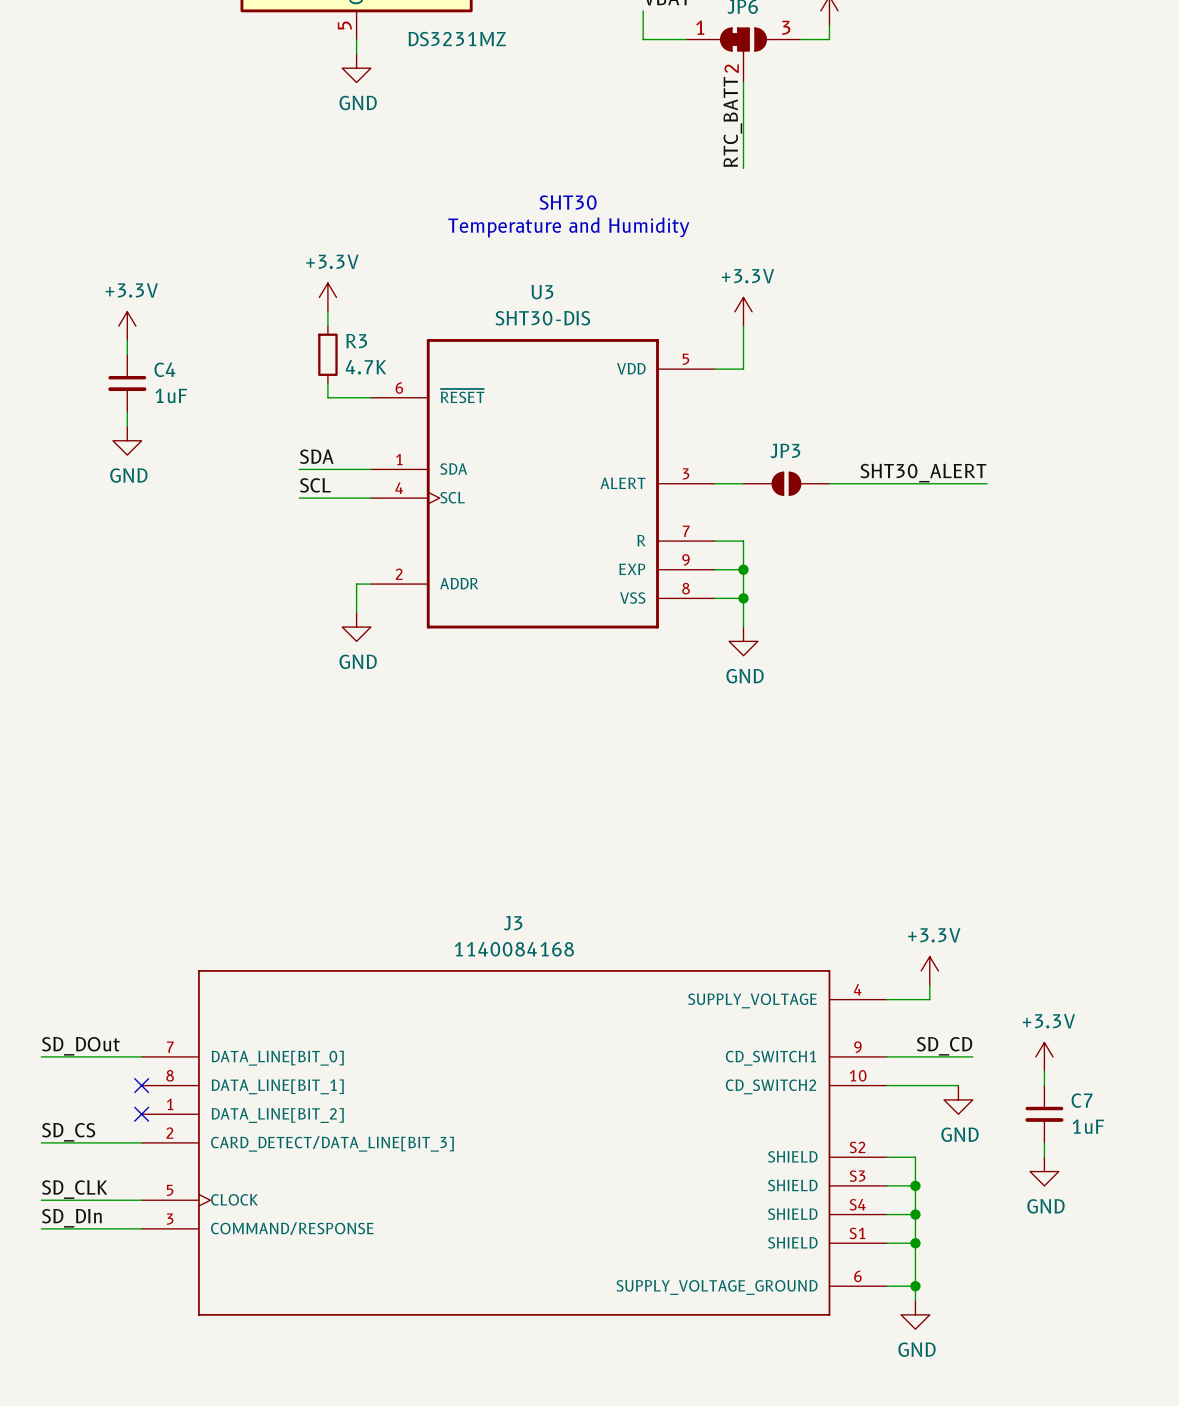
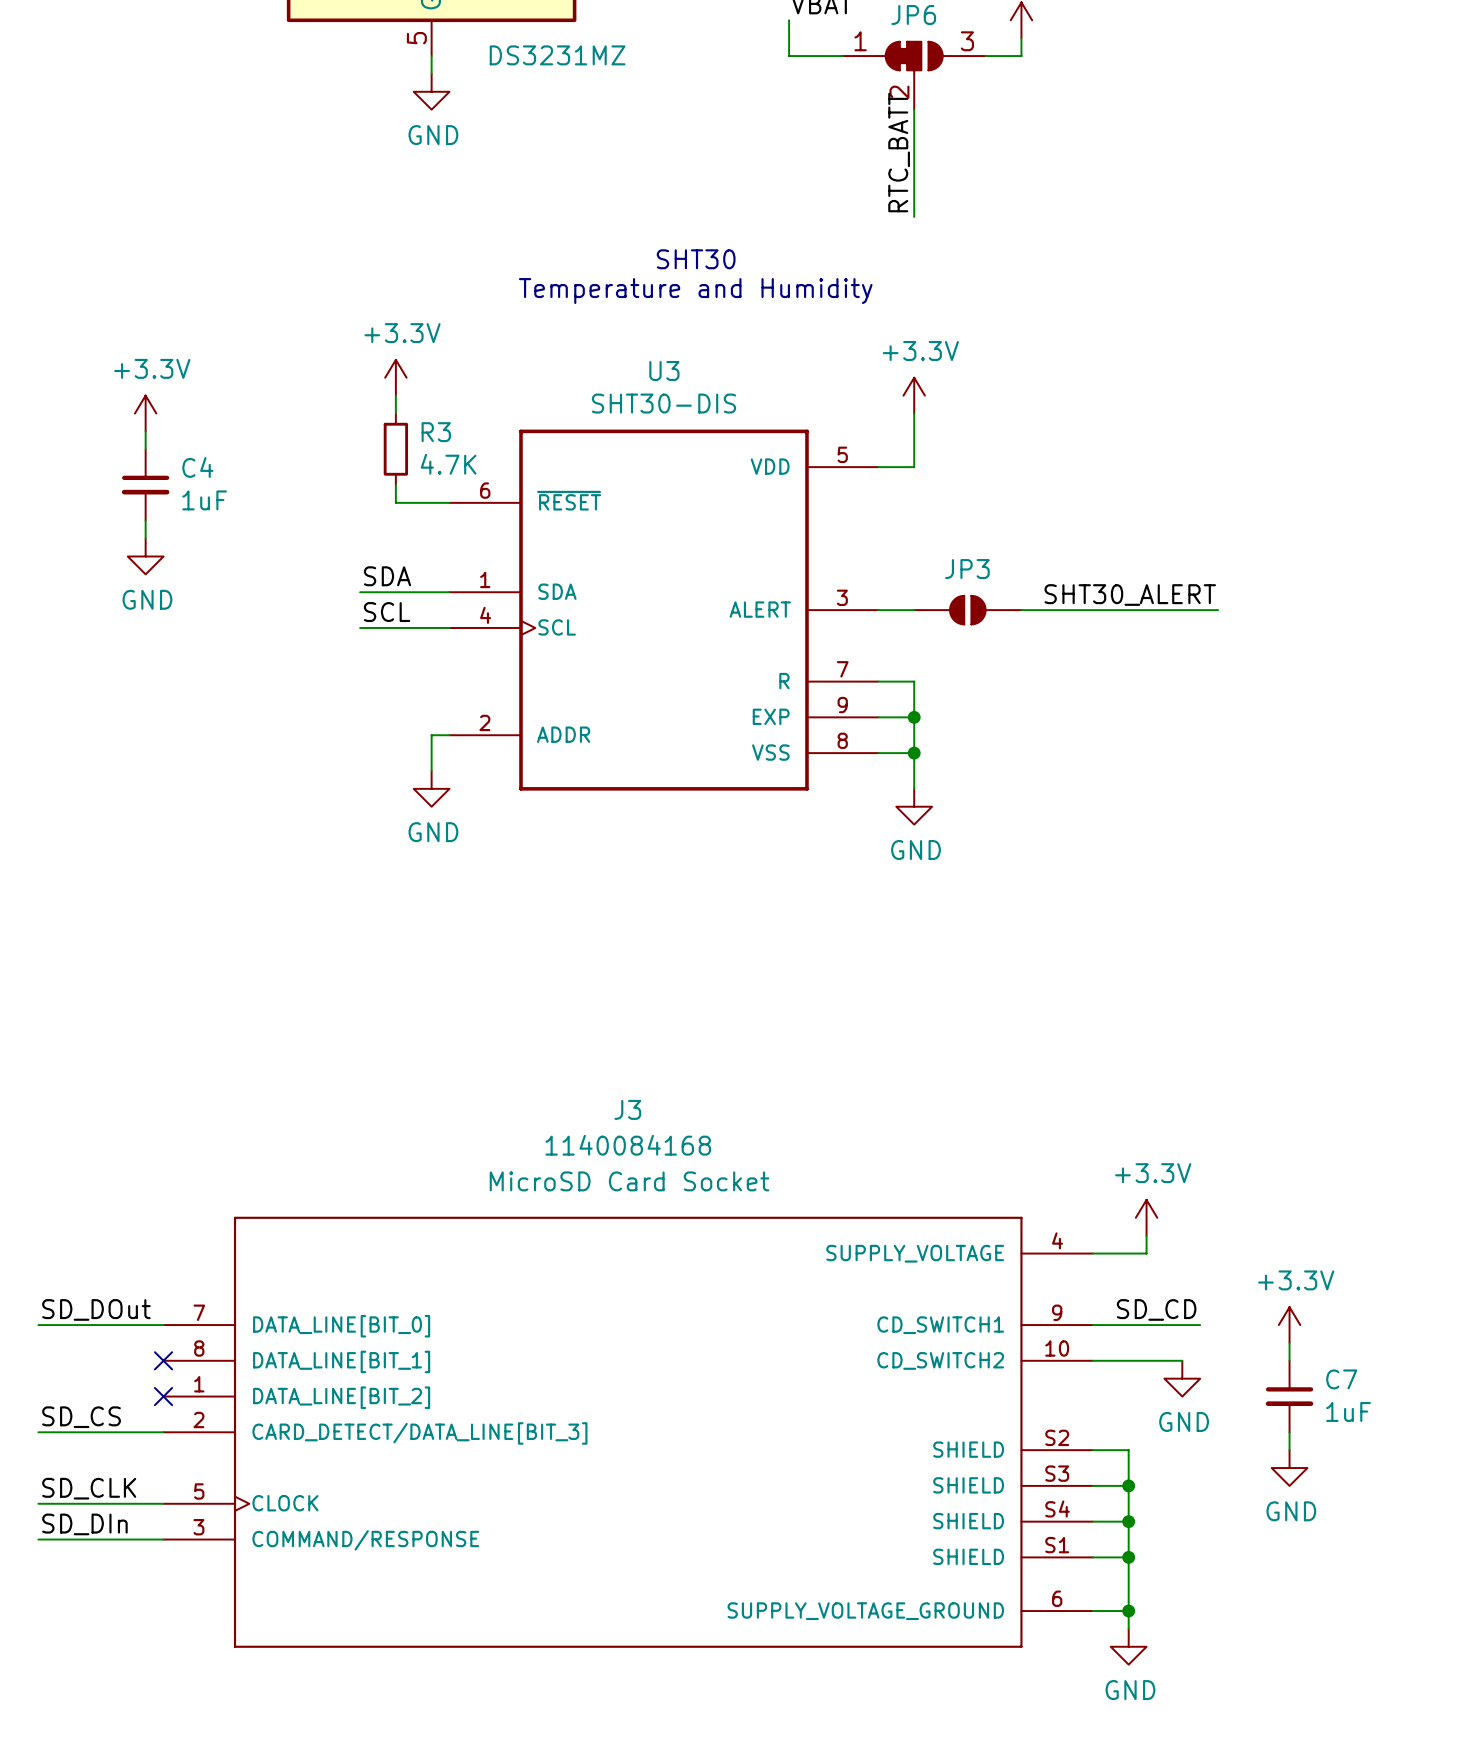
J3 name position: J3 (513, 923) -> J3 (627, 1109)
J3 text: none -> MicroSD Card Socket (629, 1181)
J3 value position: 1140084168 (514, 949) -> 1140084168 (628, 1145)

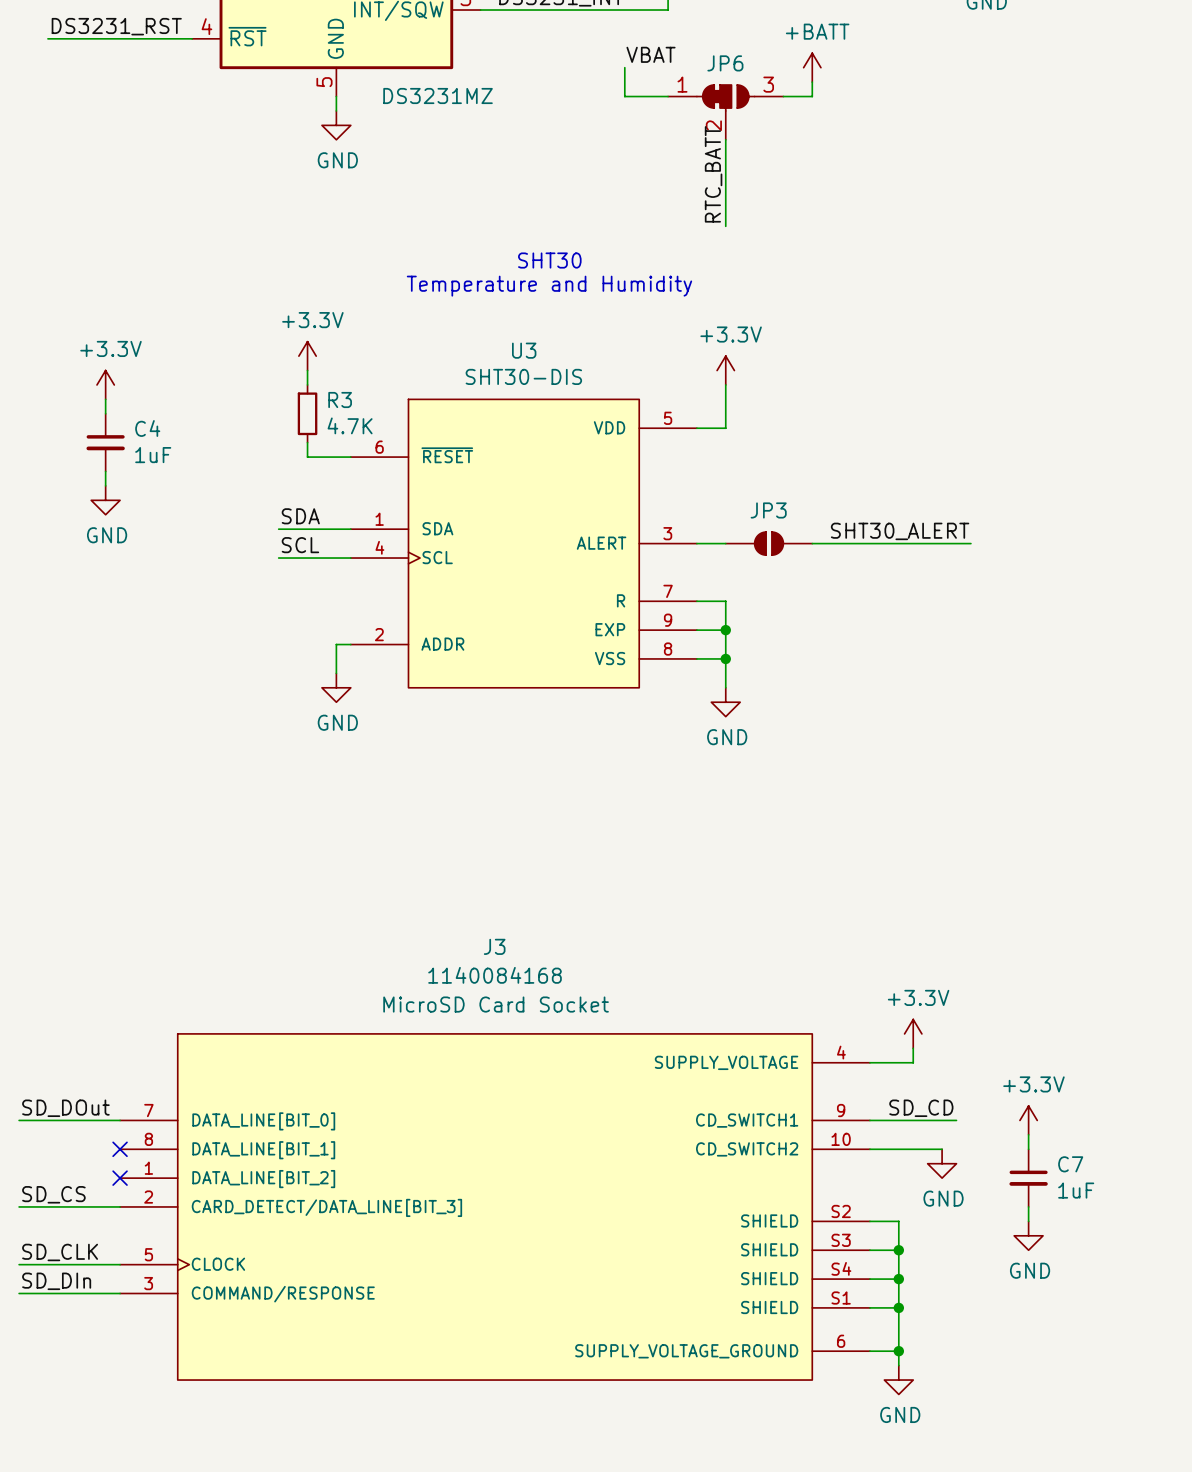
U3 symbol: [449, 429, 879, 791] -> [350, 399, 697, 688]
J3 symbol: [163, 1216, 1093, 1648] -> [120, 1033, 870, 1381]

